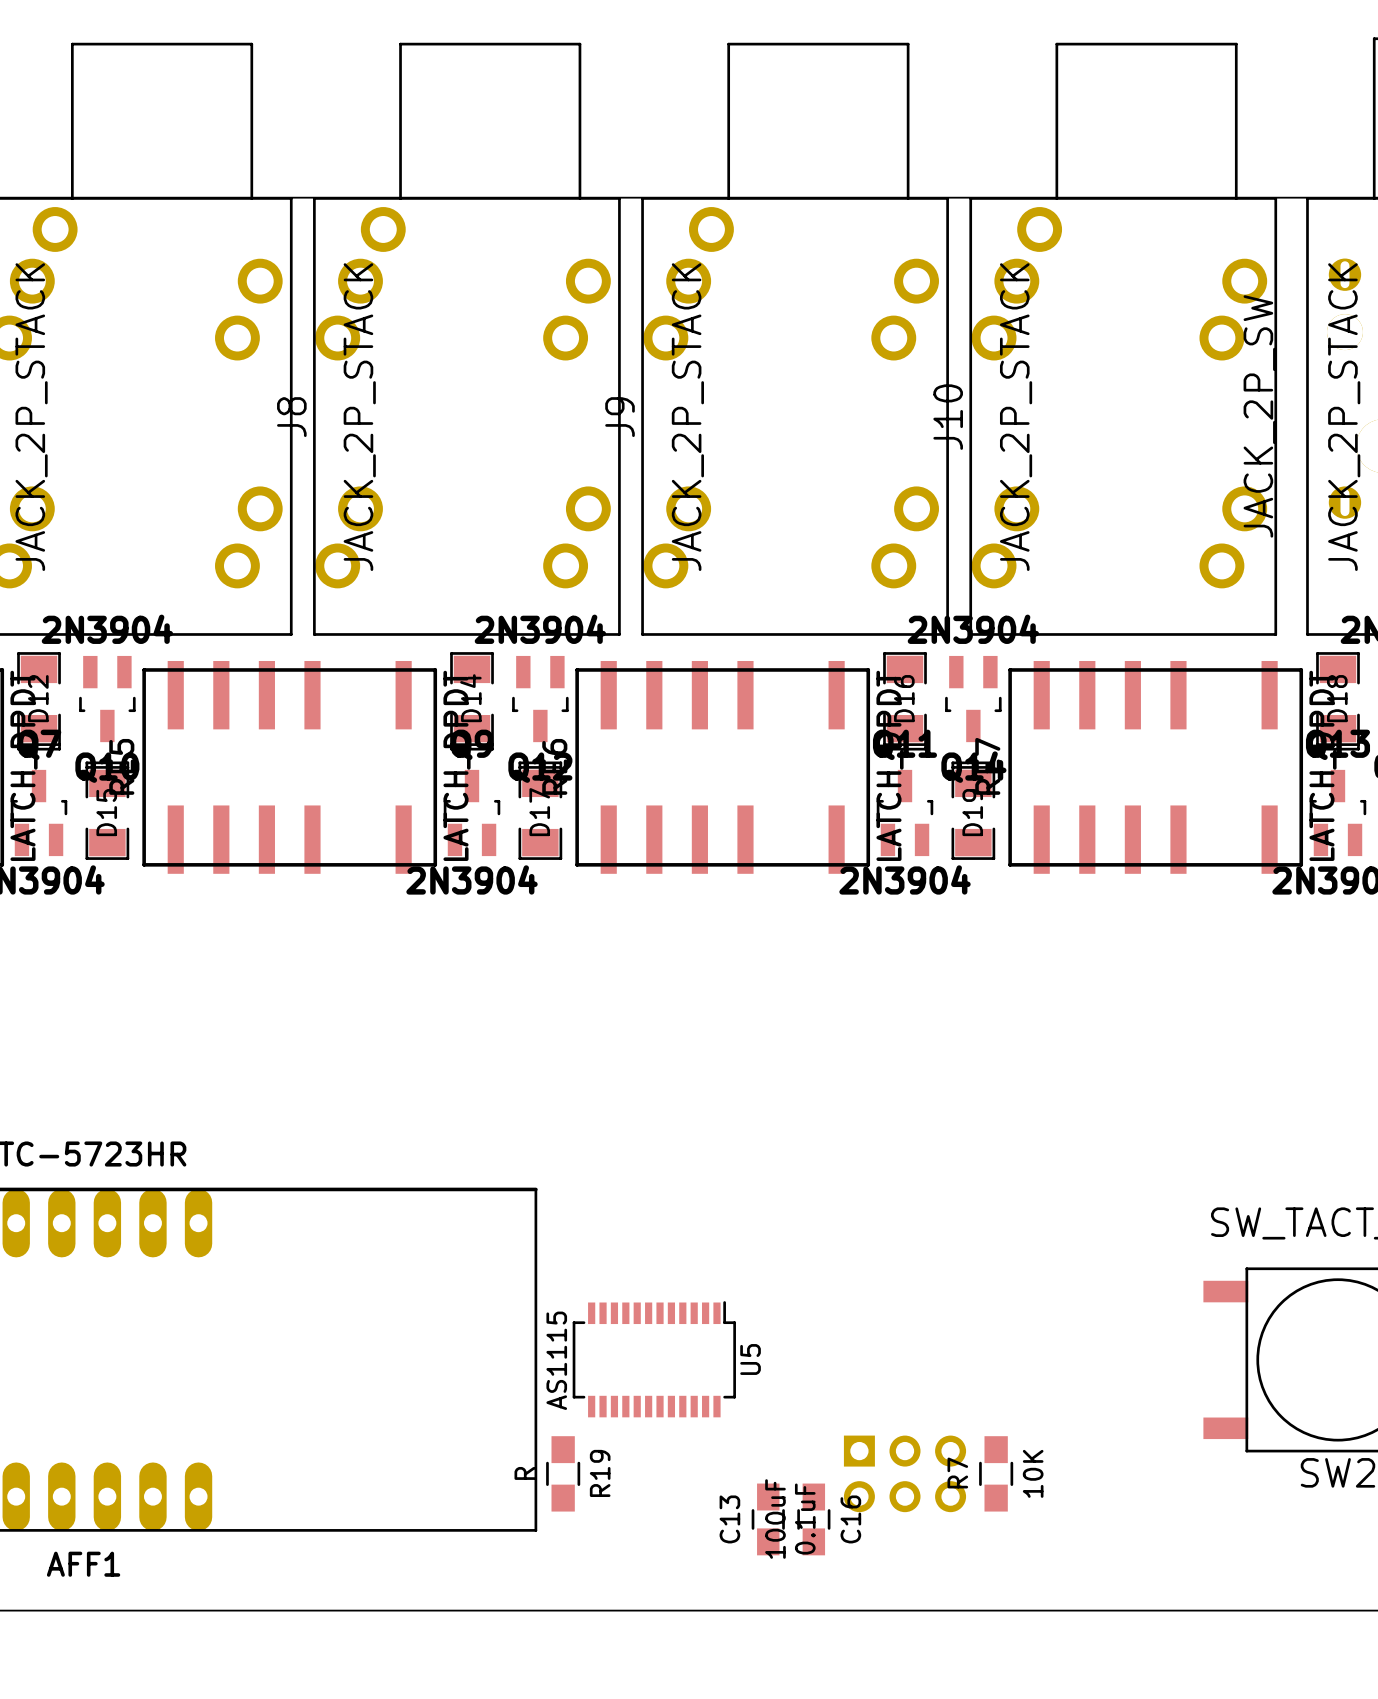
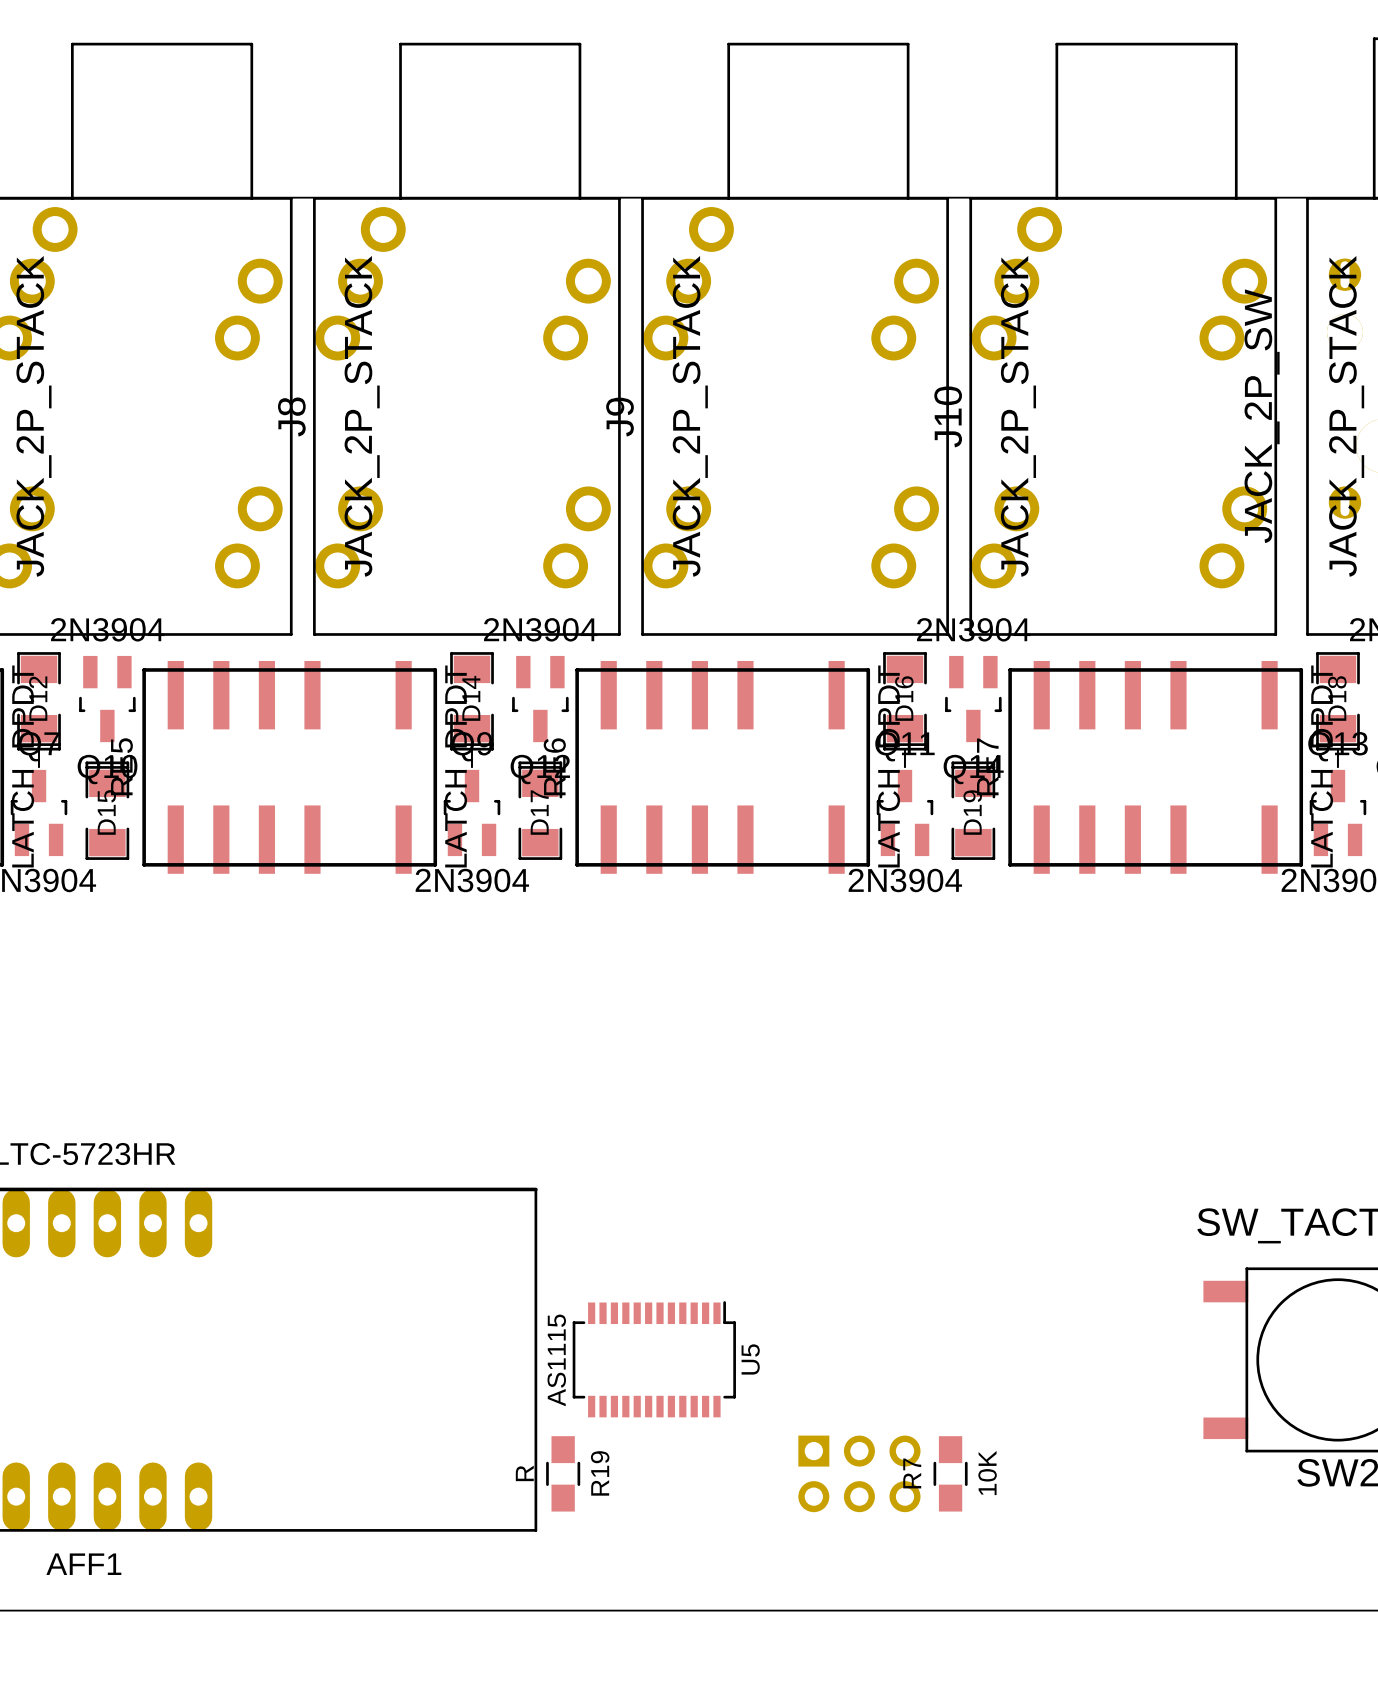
part position: (905, 1473) -> (859, 1473)
R7 position: (996, 1473) -> (950, 1473)
C13: 0.1uF (768, 1519) -> none
C16: 100uF (813, 1519) -> none

